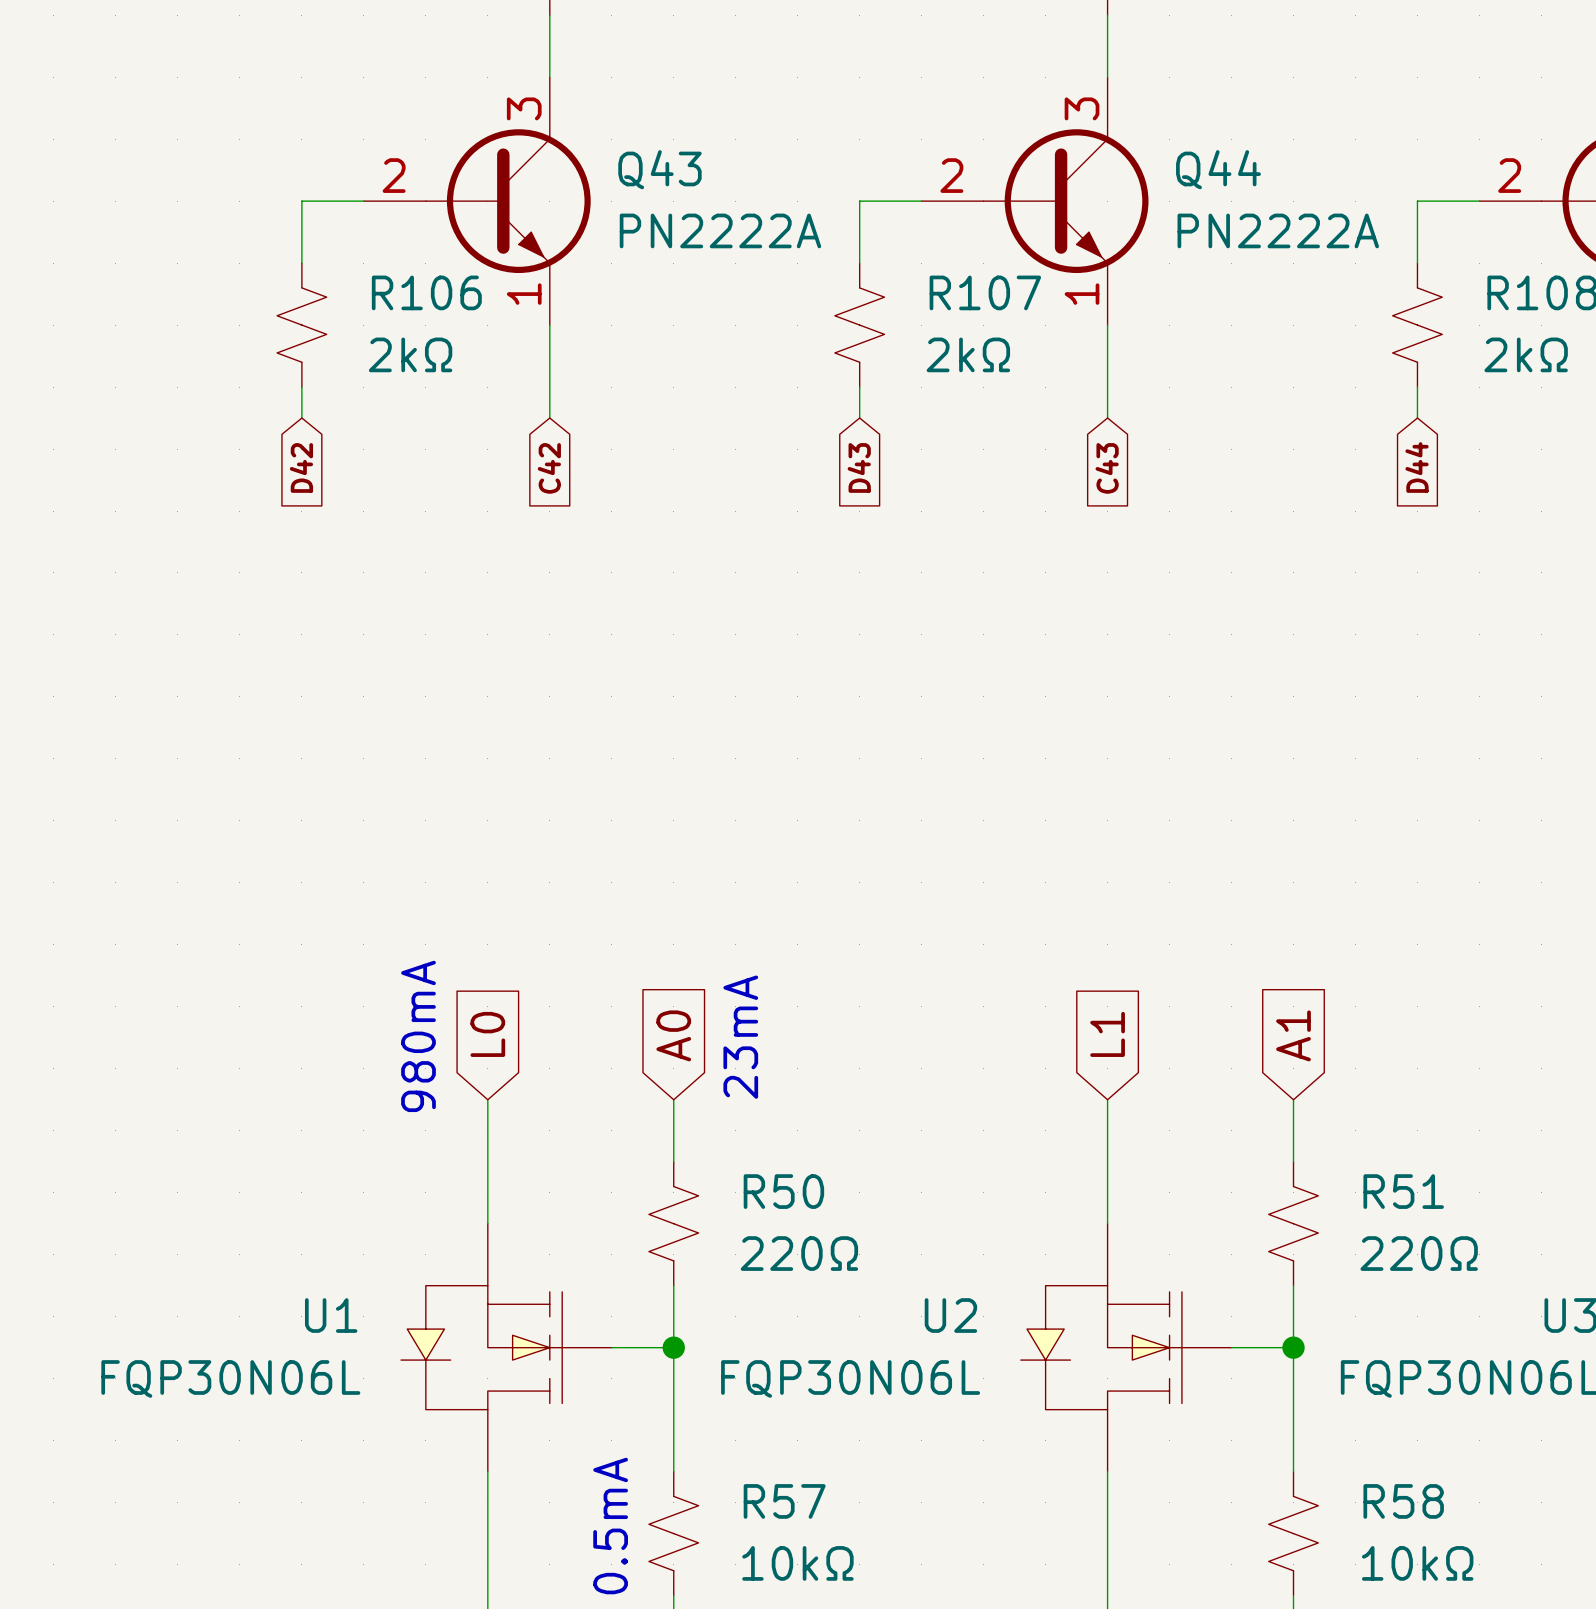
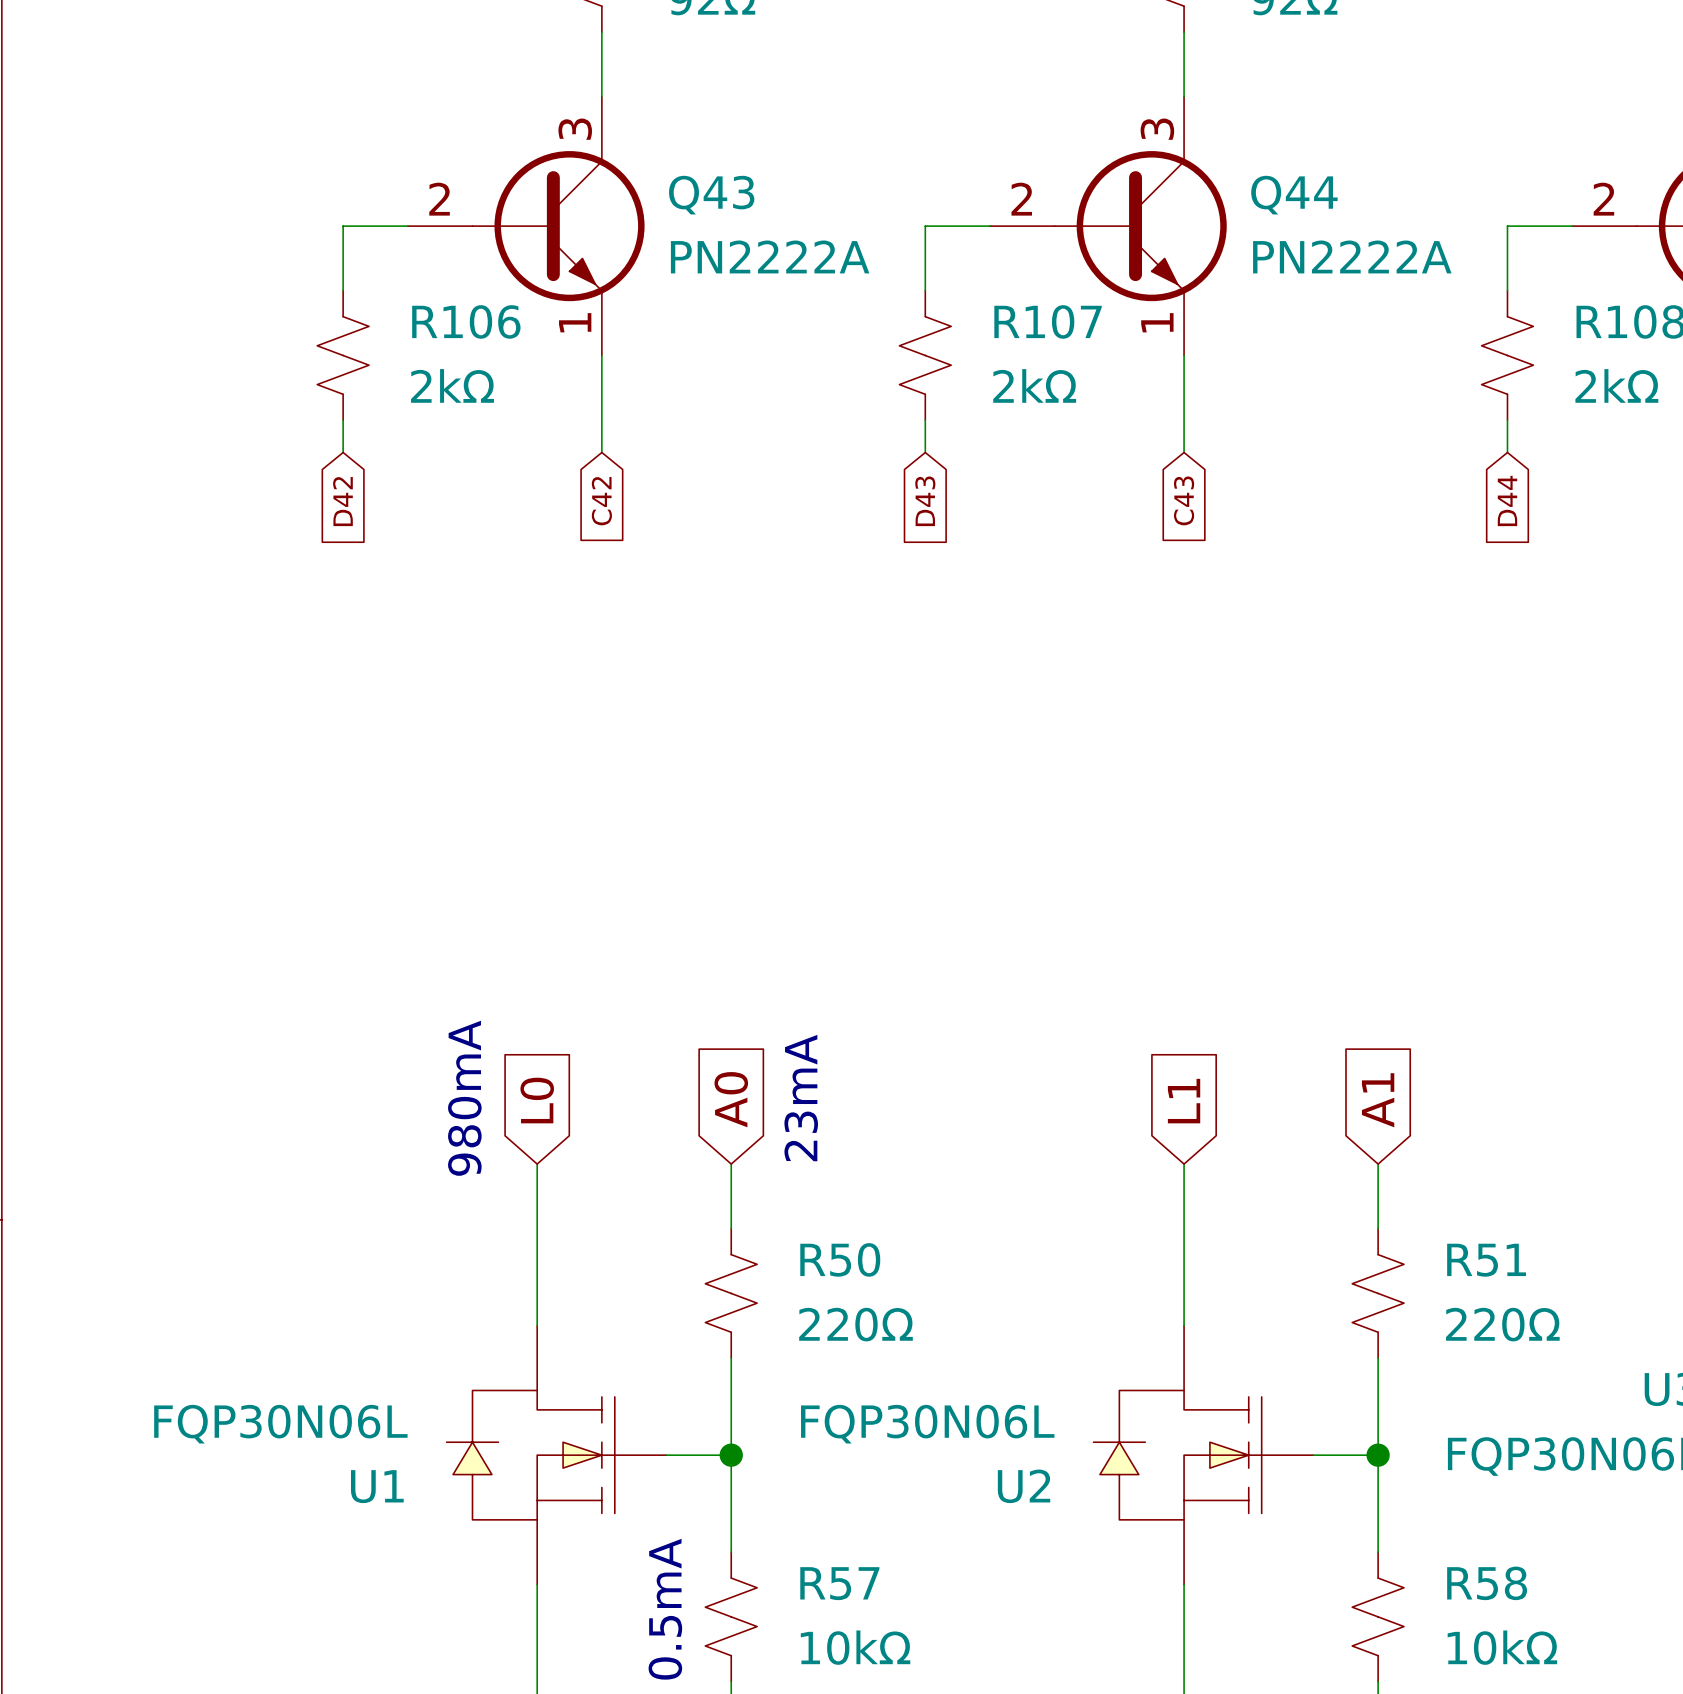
U1 flip: as is (481, 1347) -> up-down (530, 1455)
wire: (611, 1347) (673, 1347) -> (666, 1455) (731, 1455)
junction position: (673, 1347) -> (731, 1455)
U2 flip: as is (1101, 1347) -> up-down (1177, 1455)
wire: (1231, 1347) (1293, 1347) -> (1313, 1455) (1378, 1455)
junction position: (1293, 1347) -> (1378, 1455)

